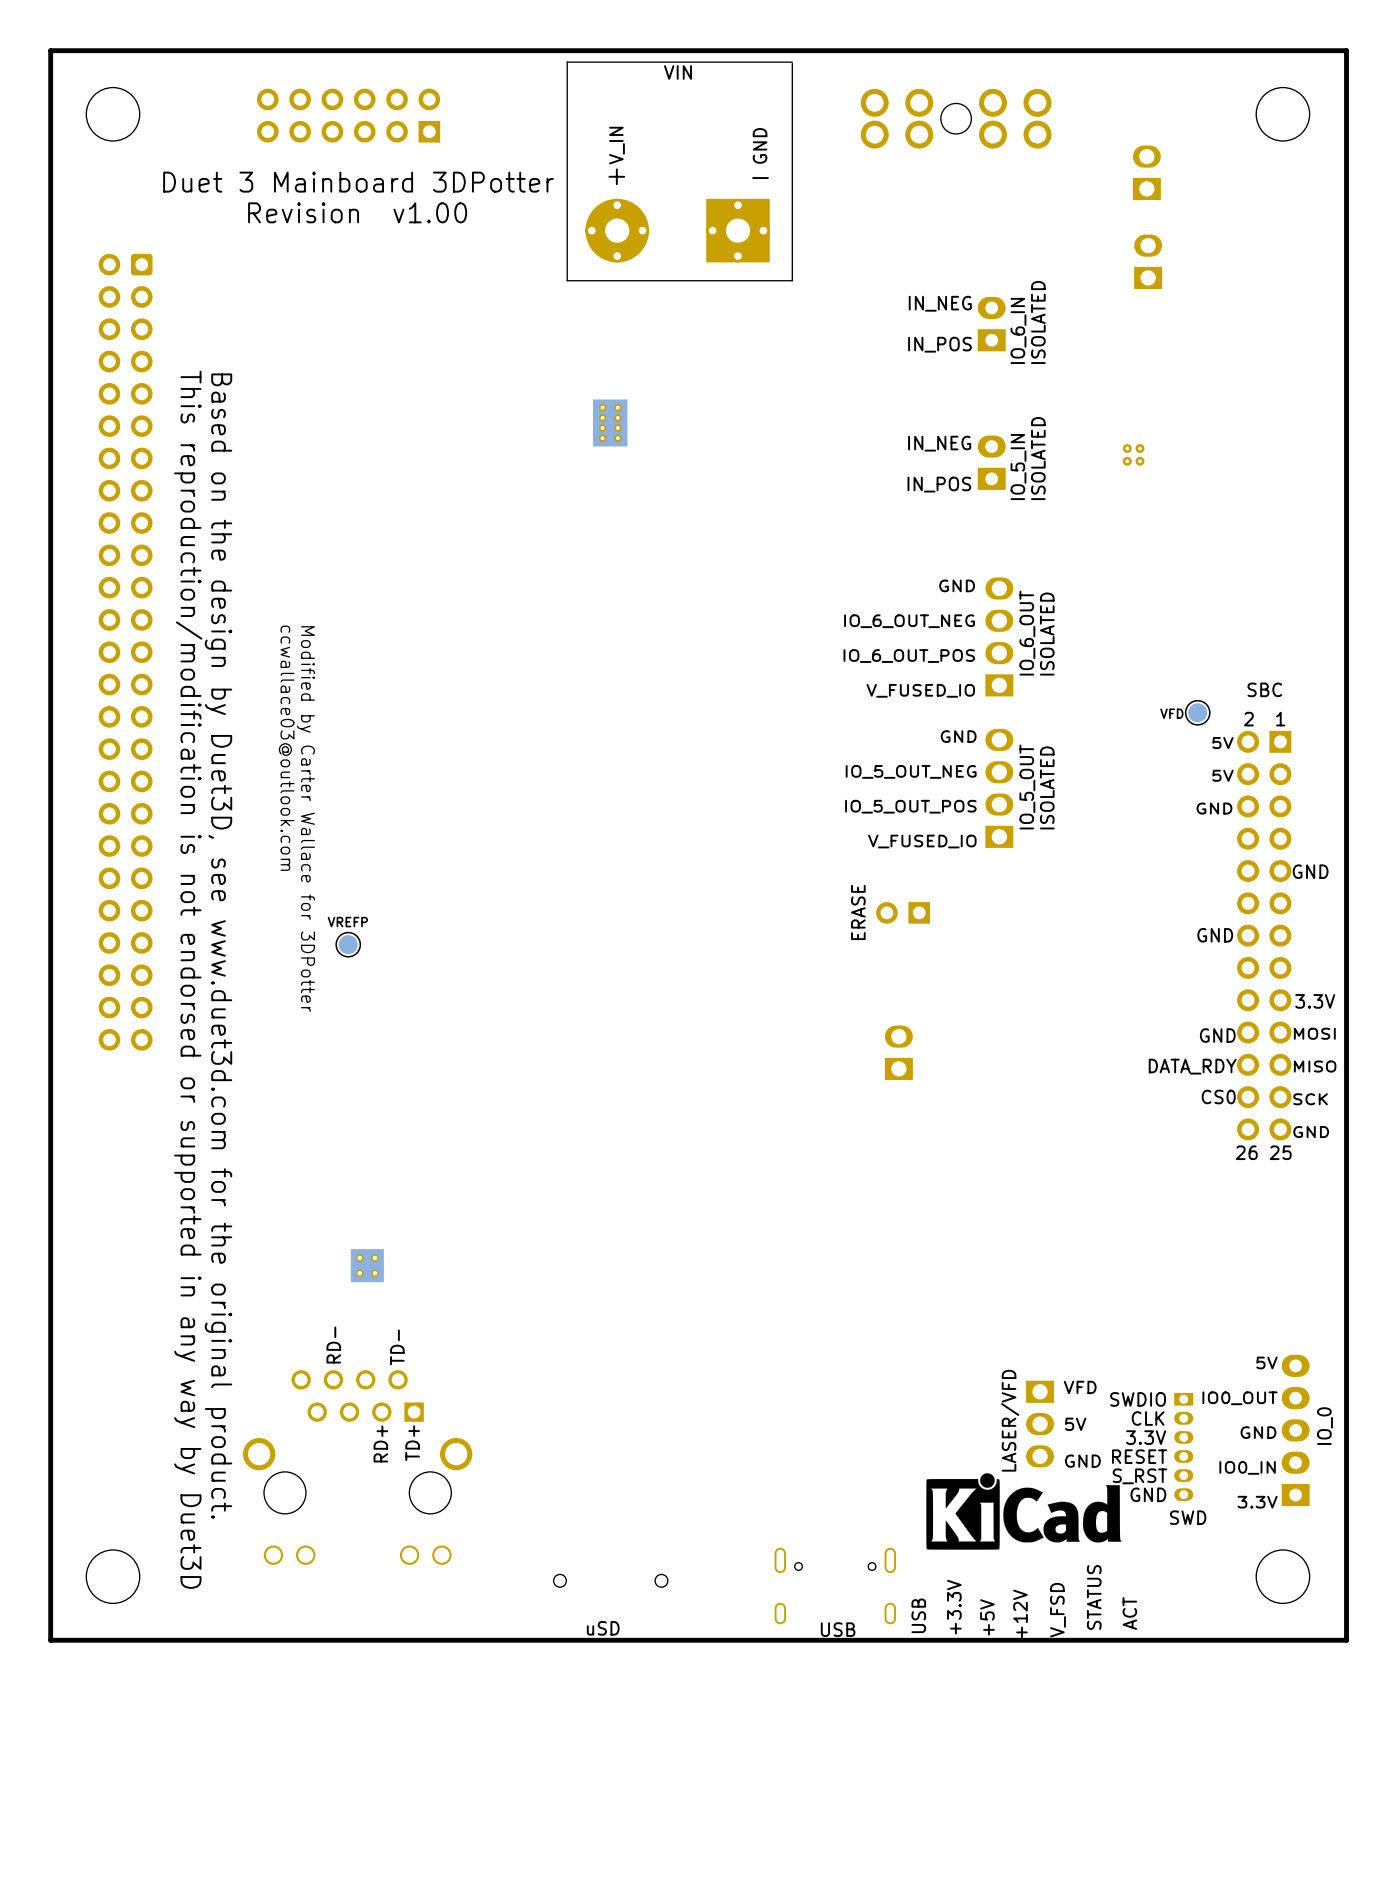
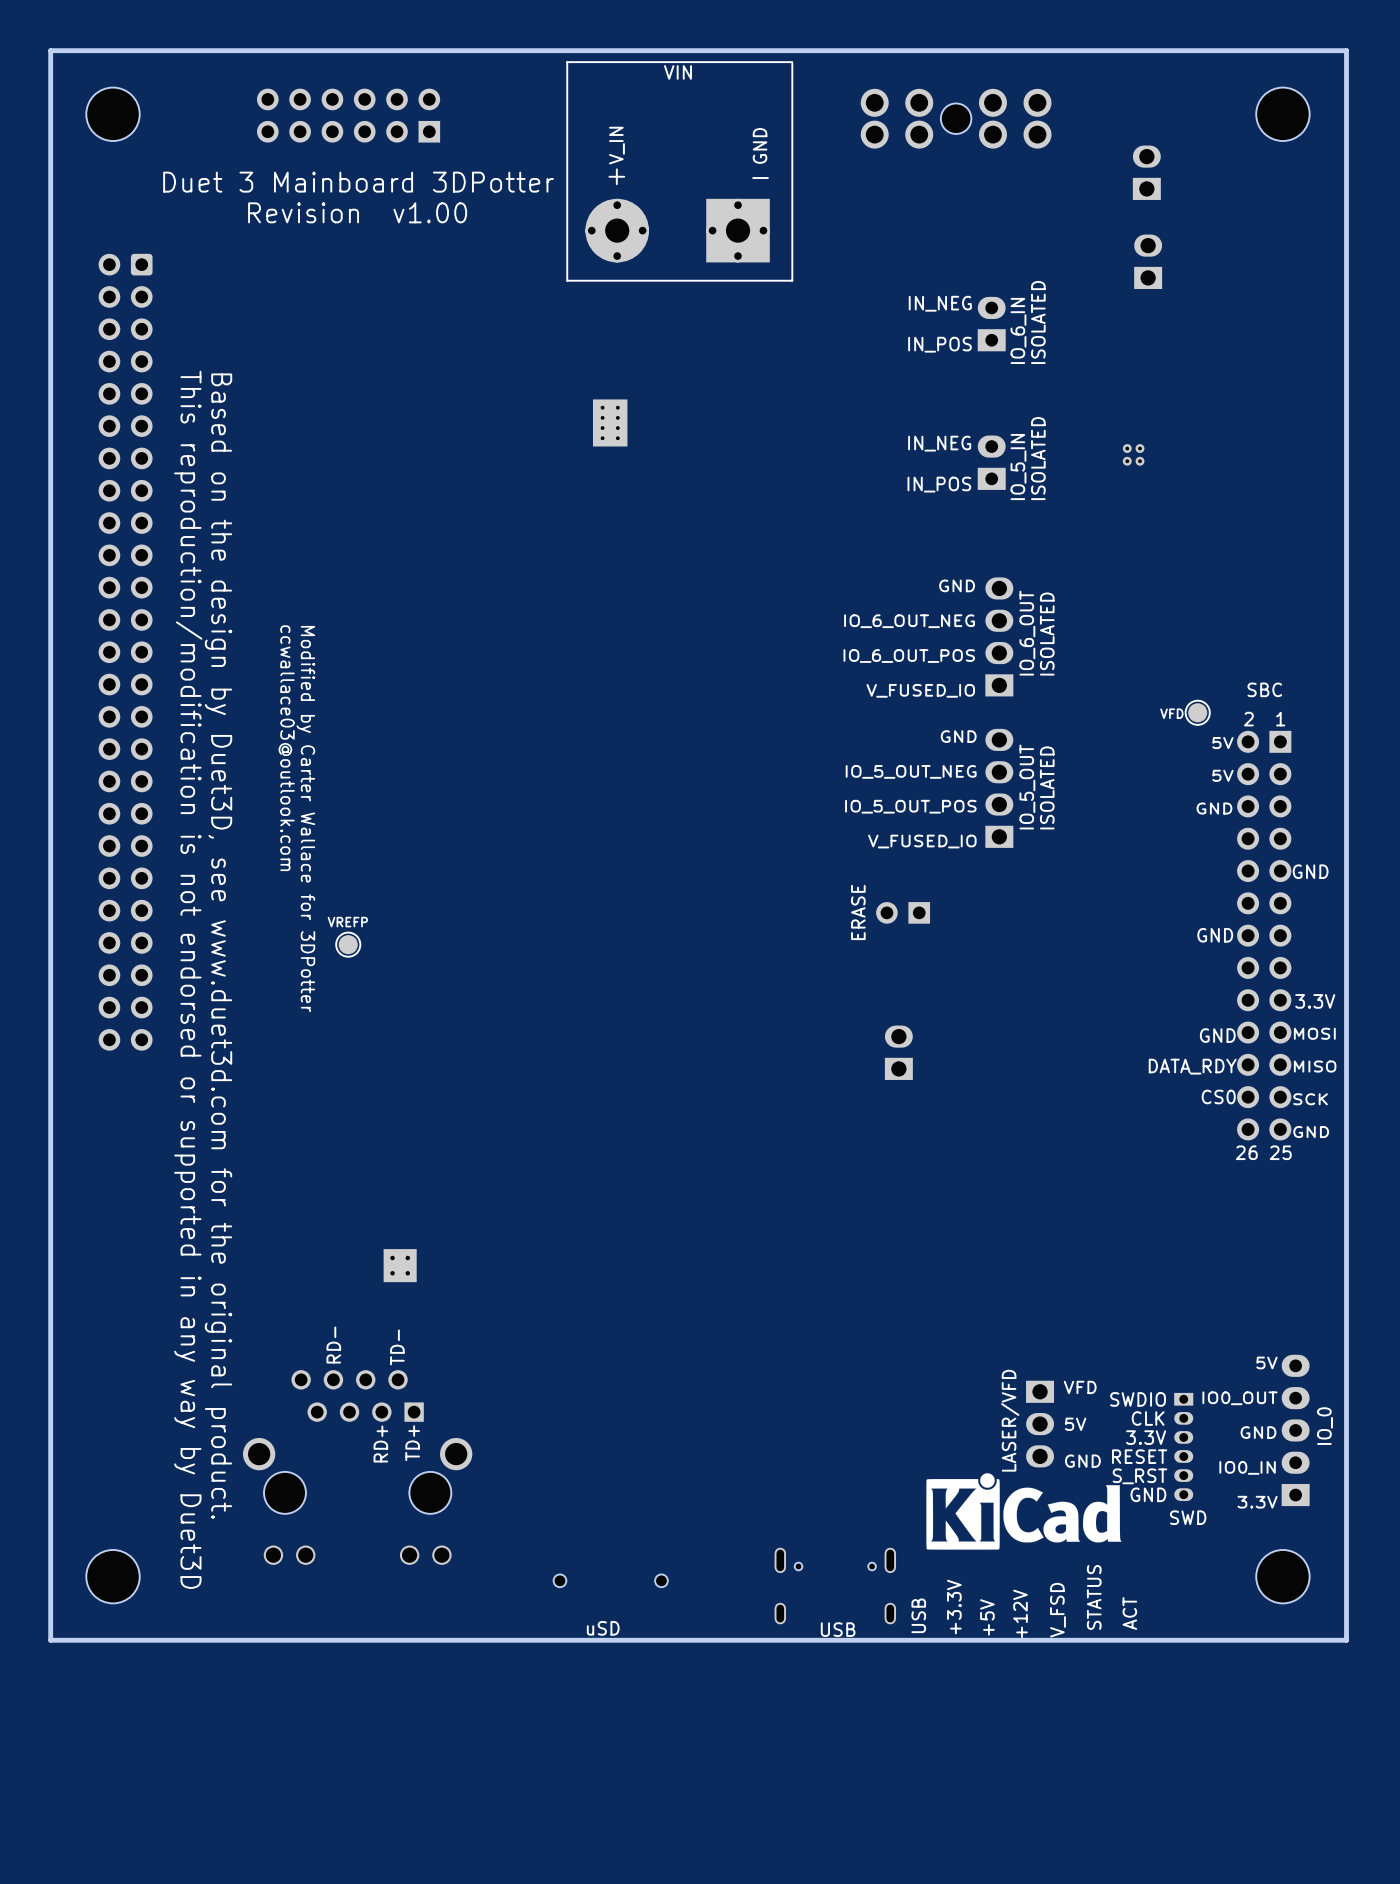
part position: (367, 1265) -> (400, 1265)

